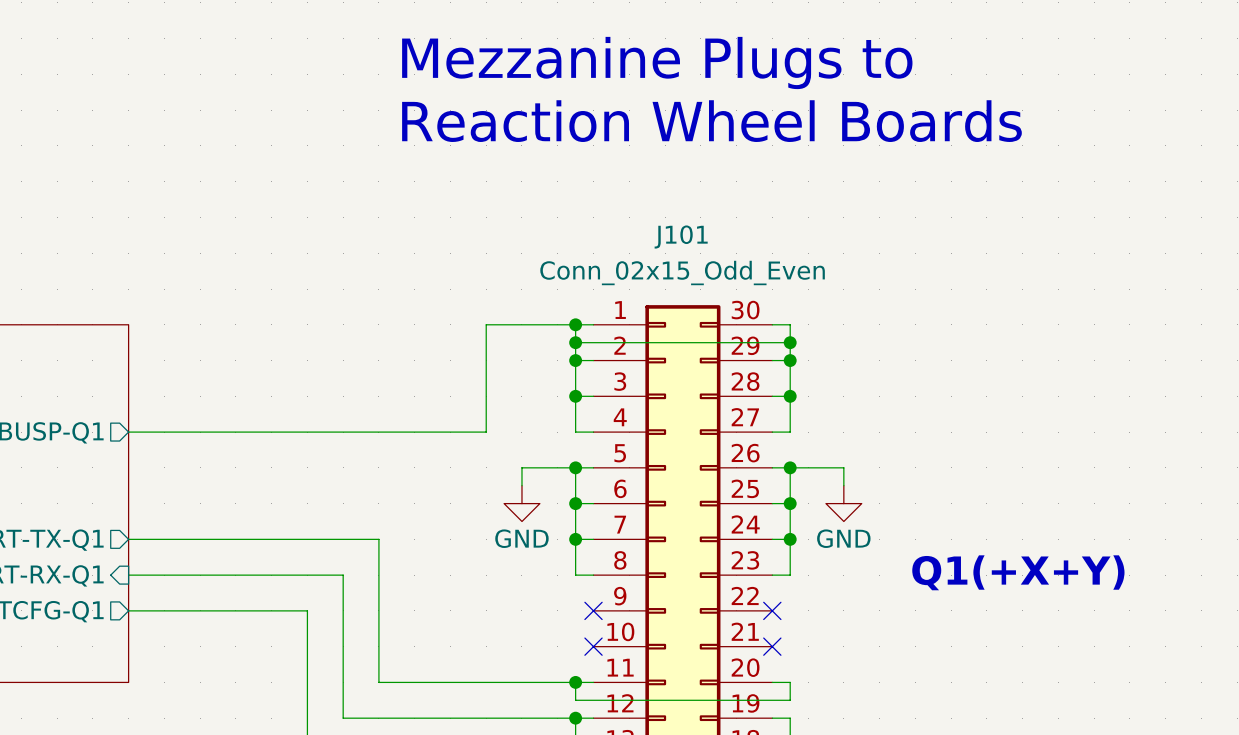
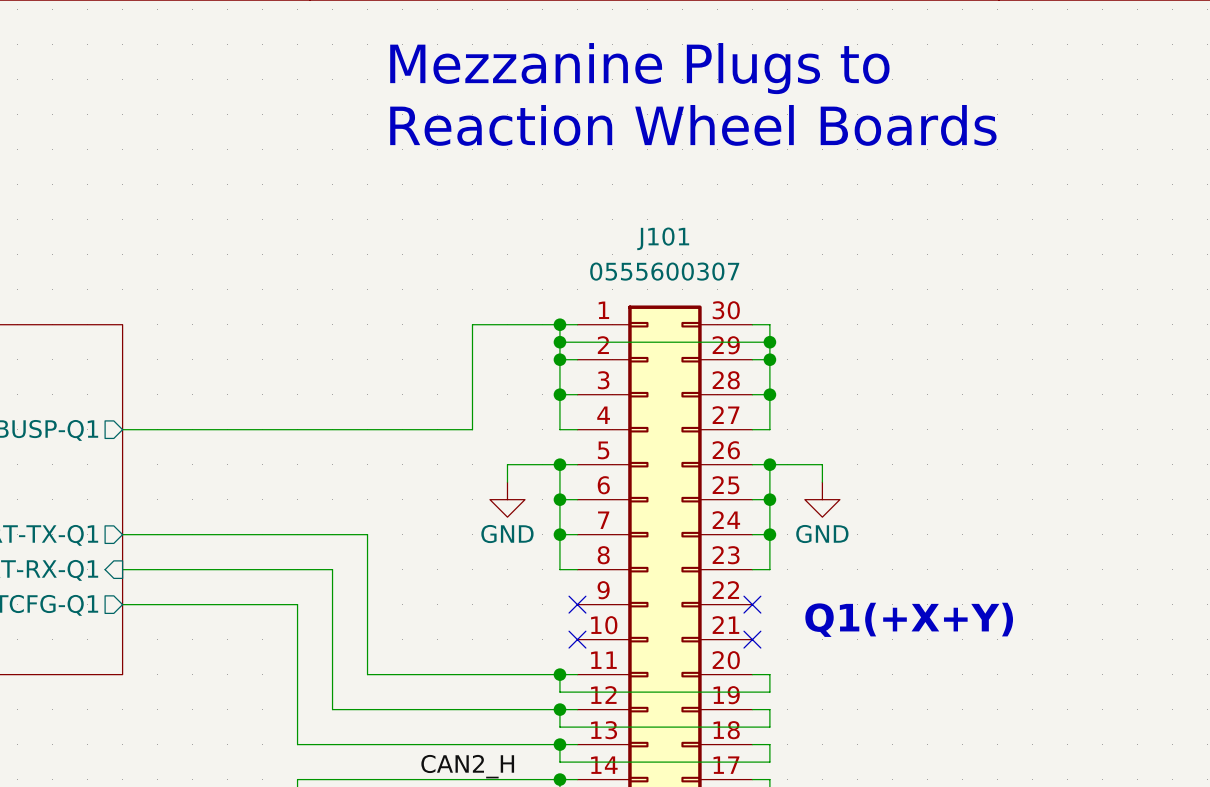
J101 value: Conn_02x15_Odd_Even (682, 272) -> 0555600307 (664, 271)
text position: Q1(+X+Y) (1018, 572) -> Q1(+X+Y) (909, 619)

